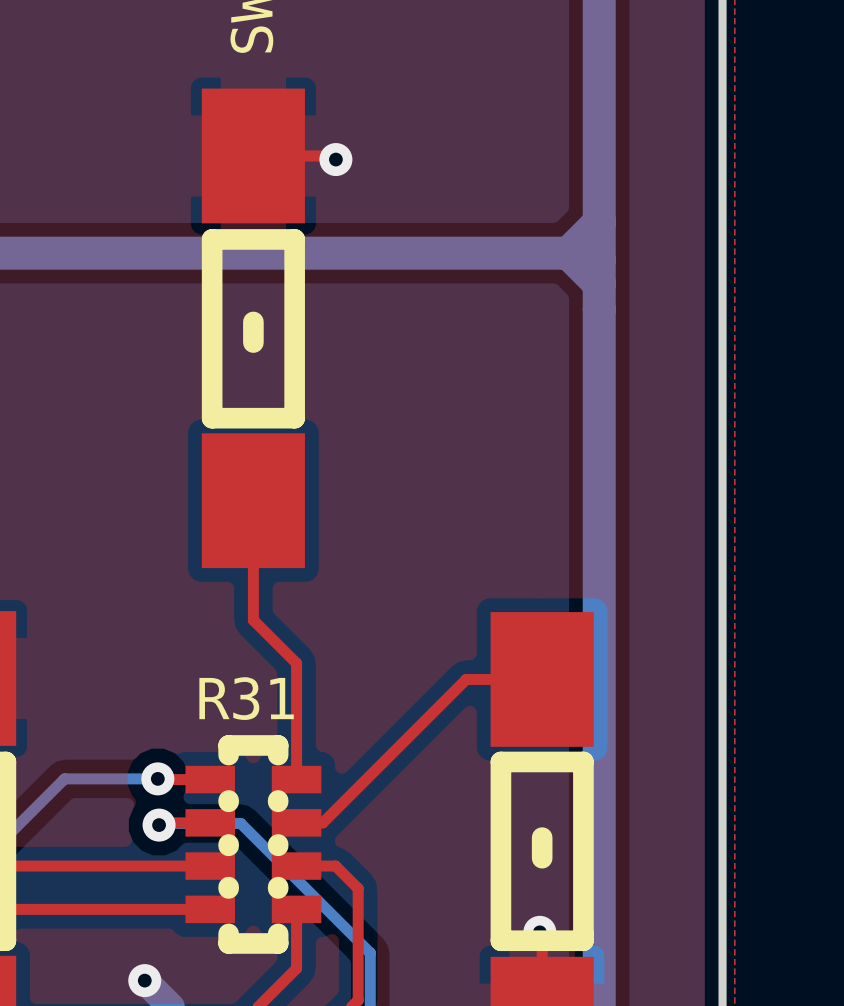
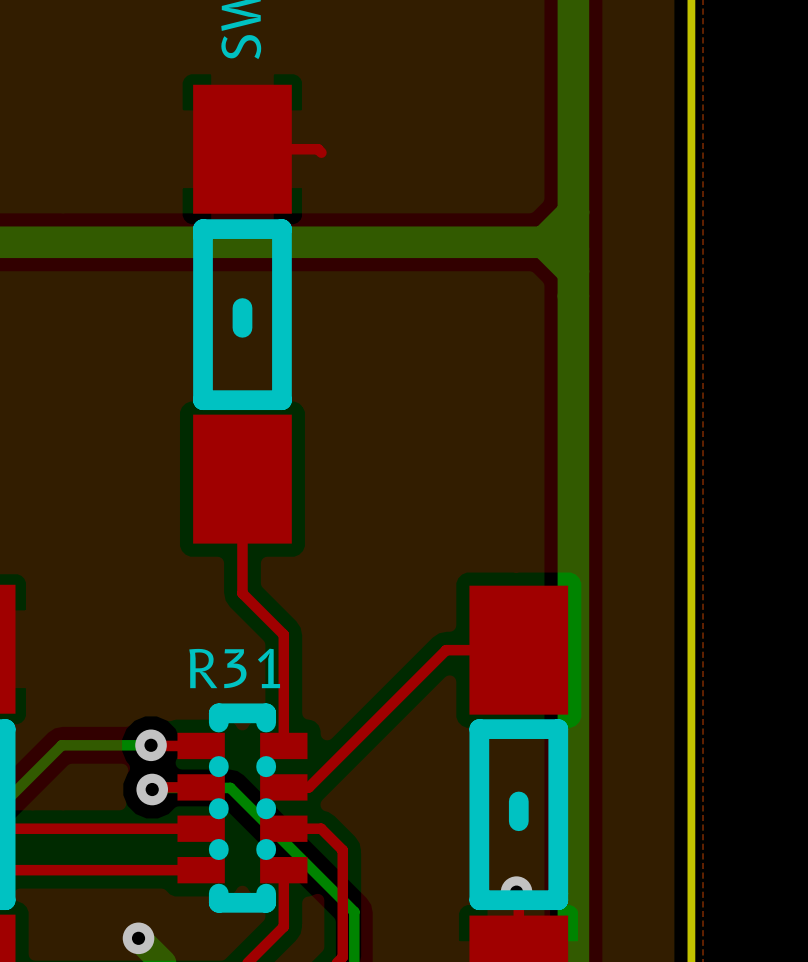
via: (335, 159) -> none

